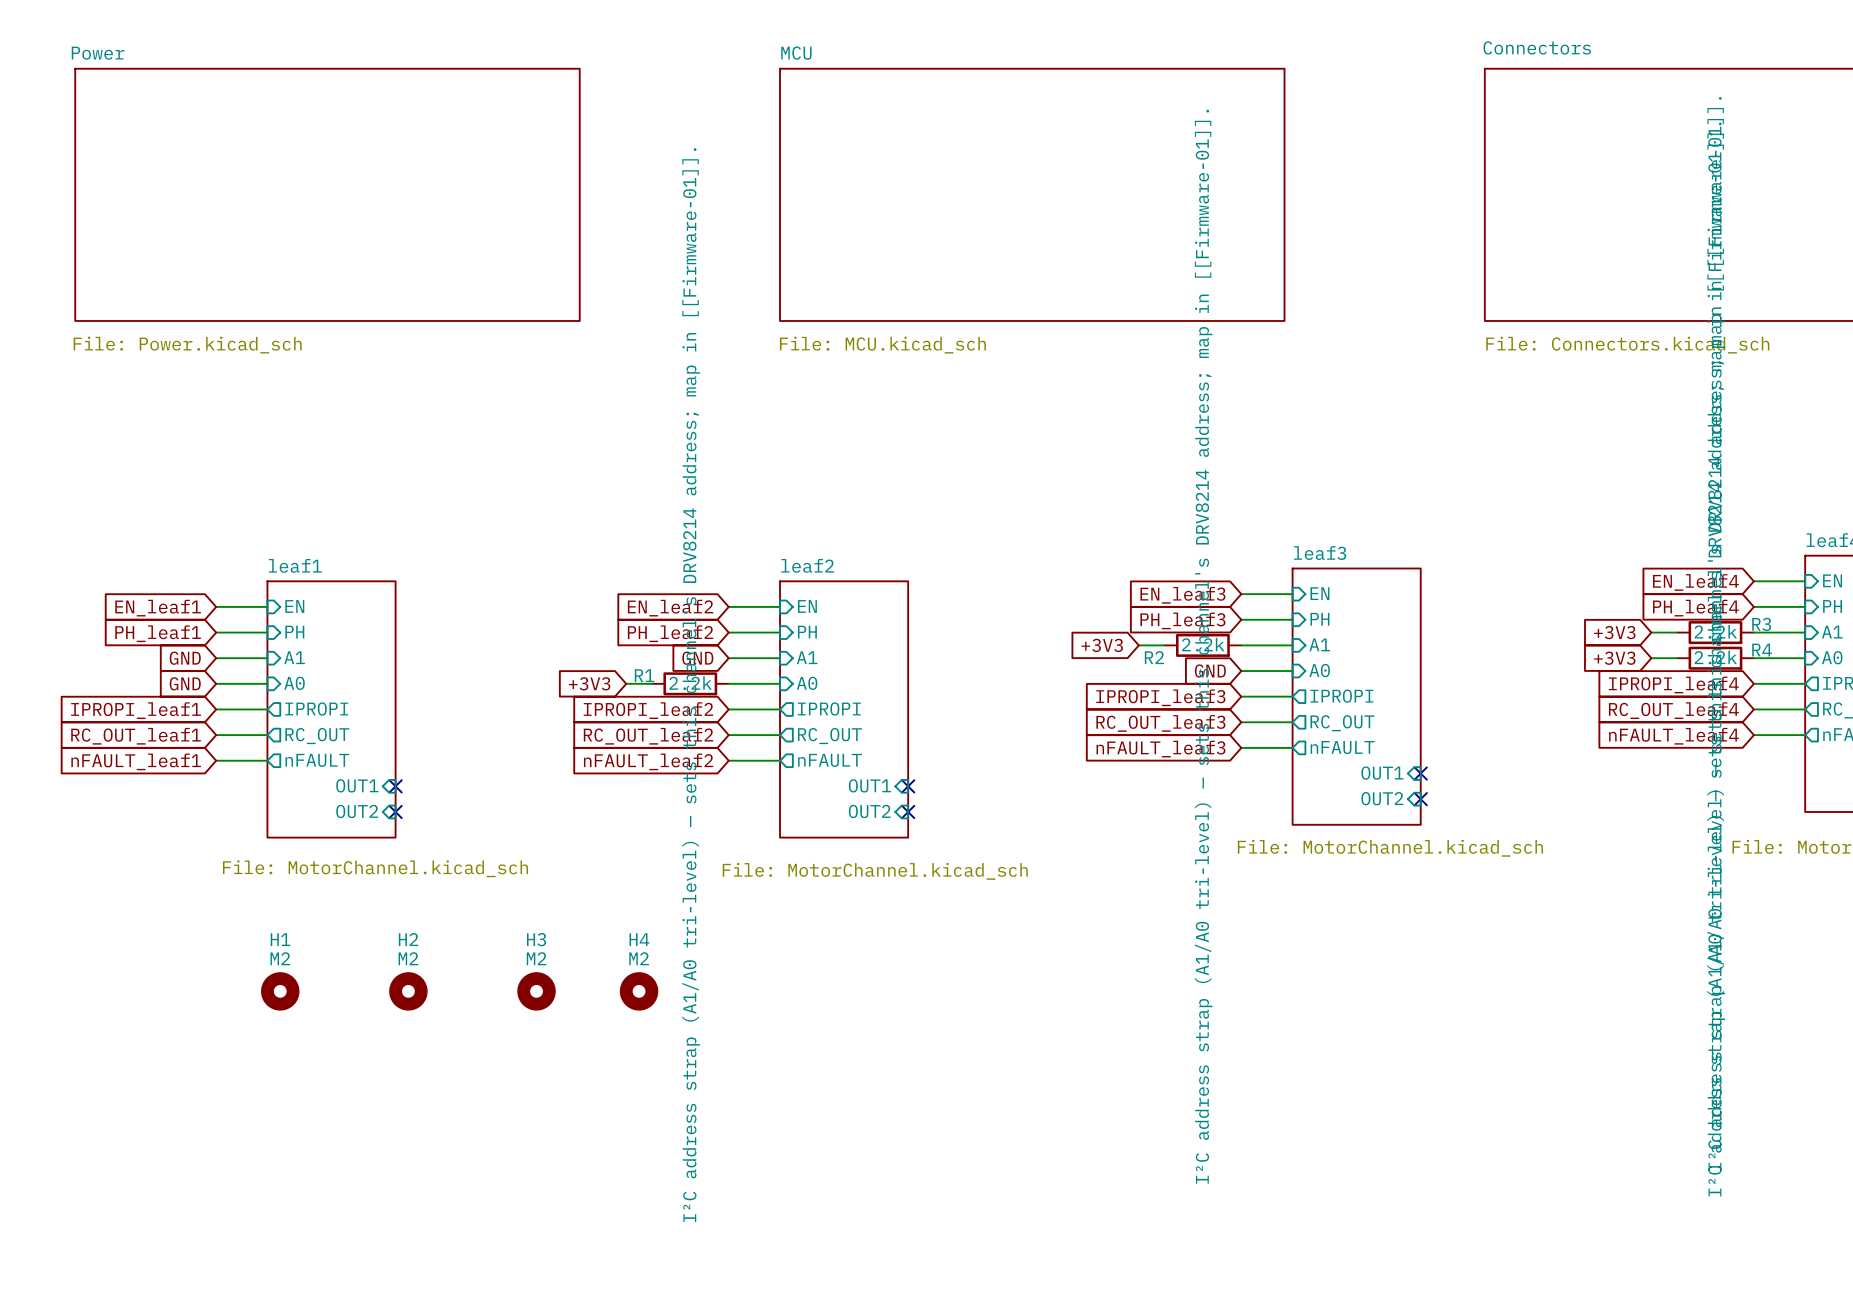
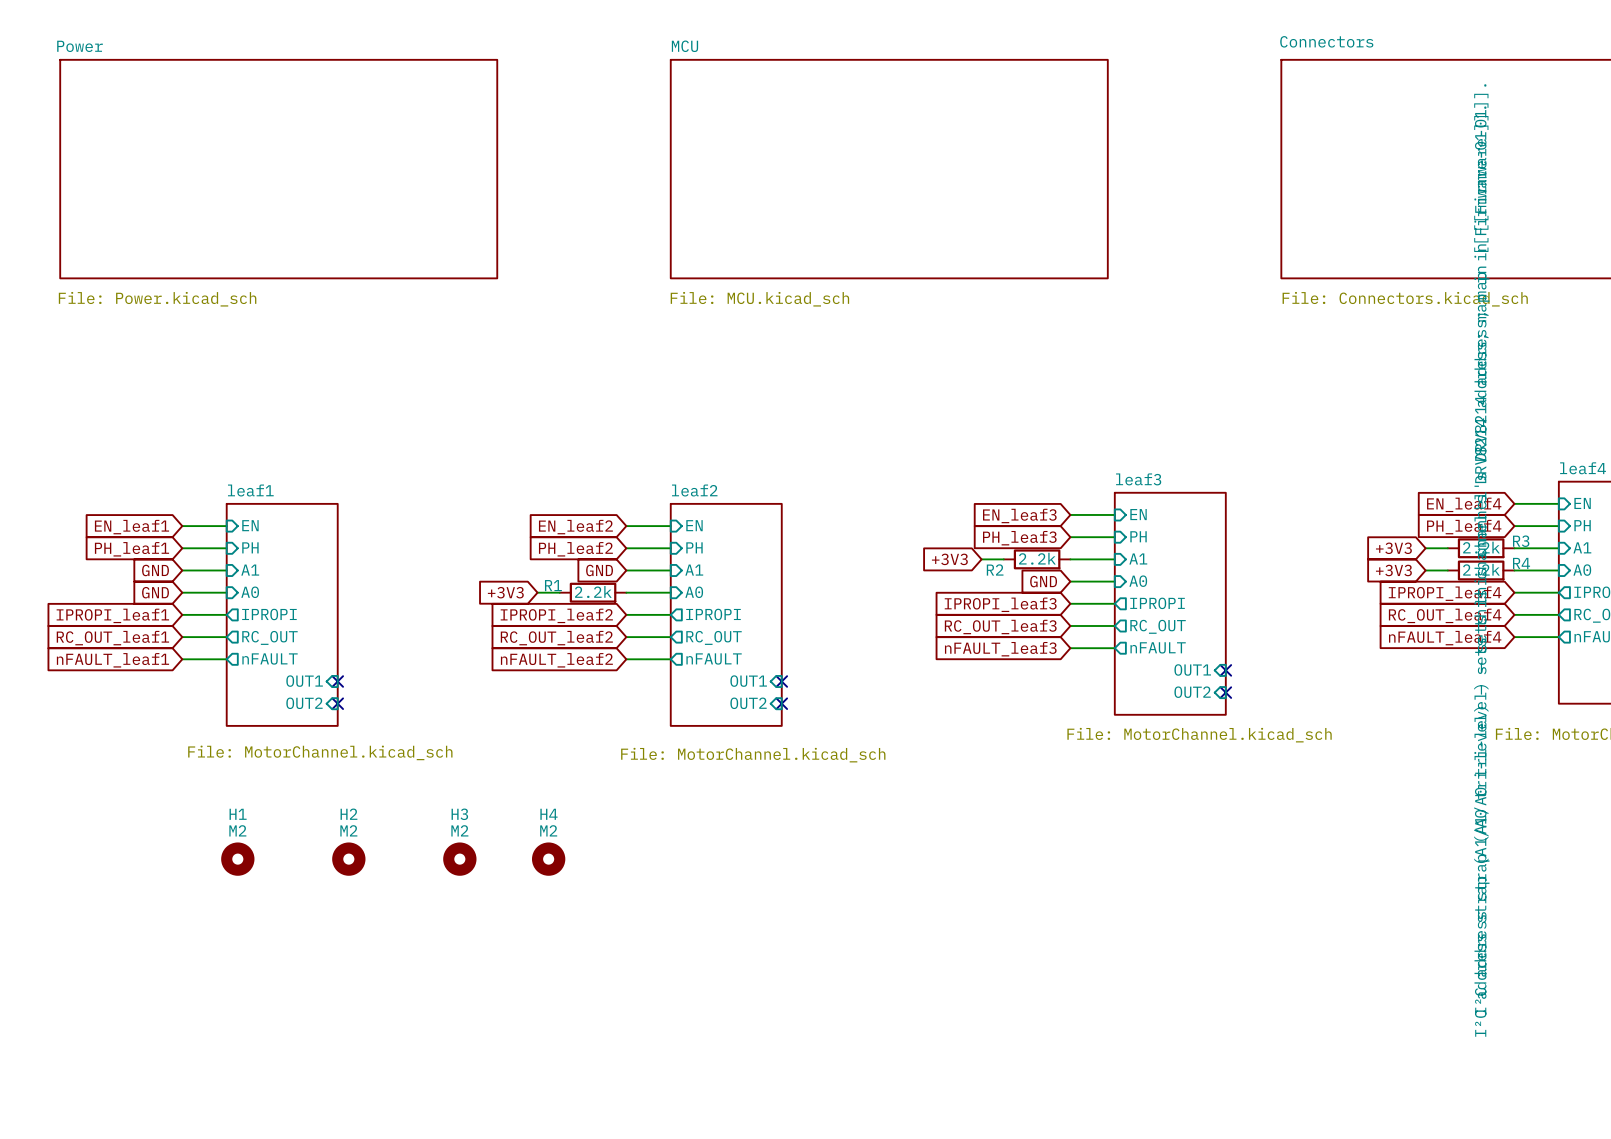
R2 text: I²C address strap (A1/A0 tri-level) — sets this channel's DRV8214 address; map in [[Firmware-01]]. (1203, 646) -> none
R1 text: I²C address strap (A1/A0 tri-level) — sets this channel's DRV8214 address; map in [[Firmware-01]]. (691, 685) -> none

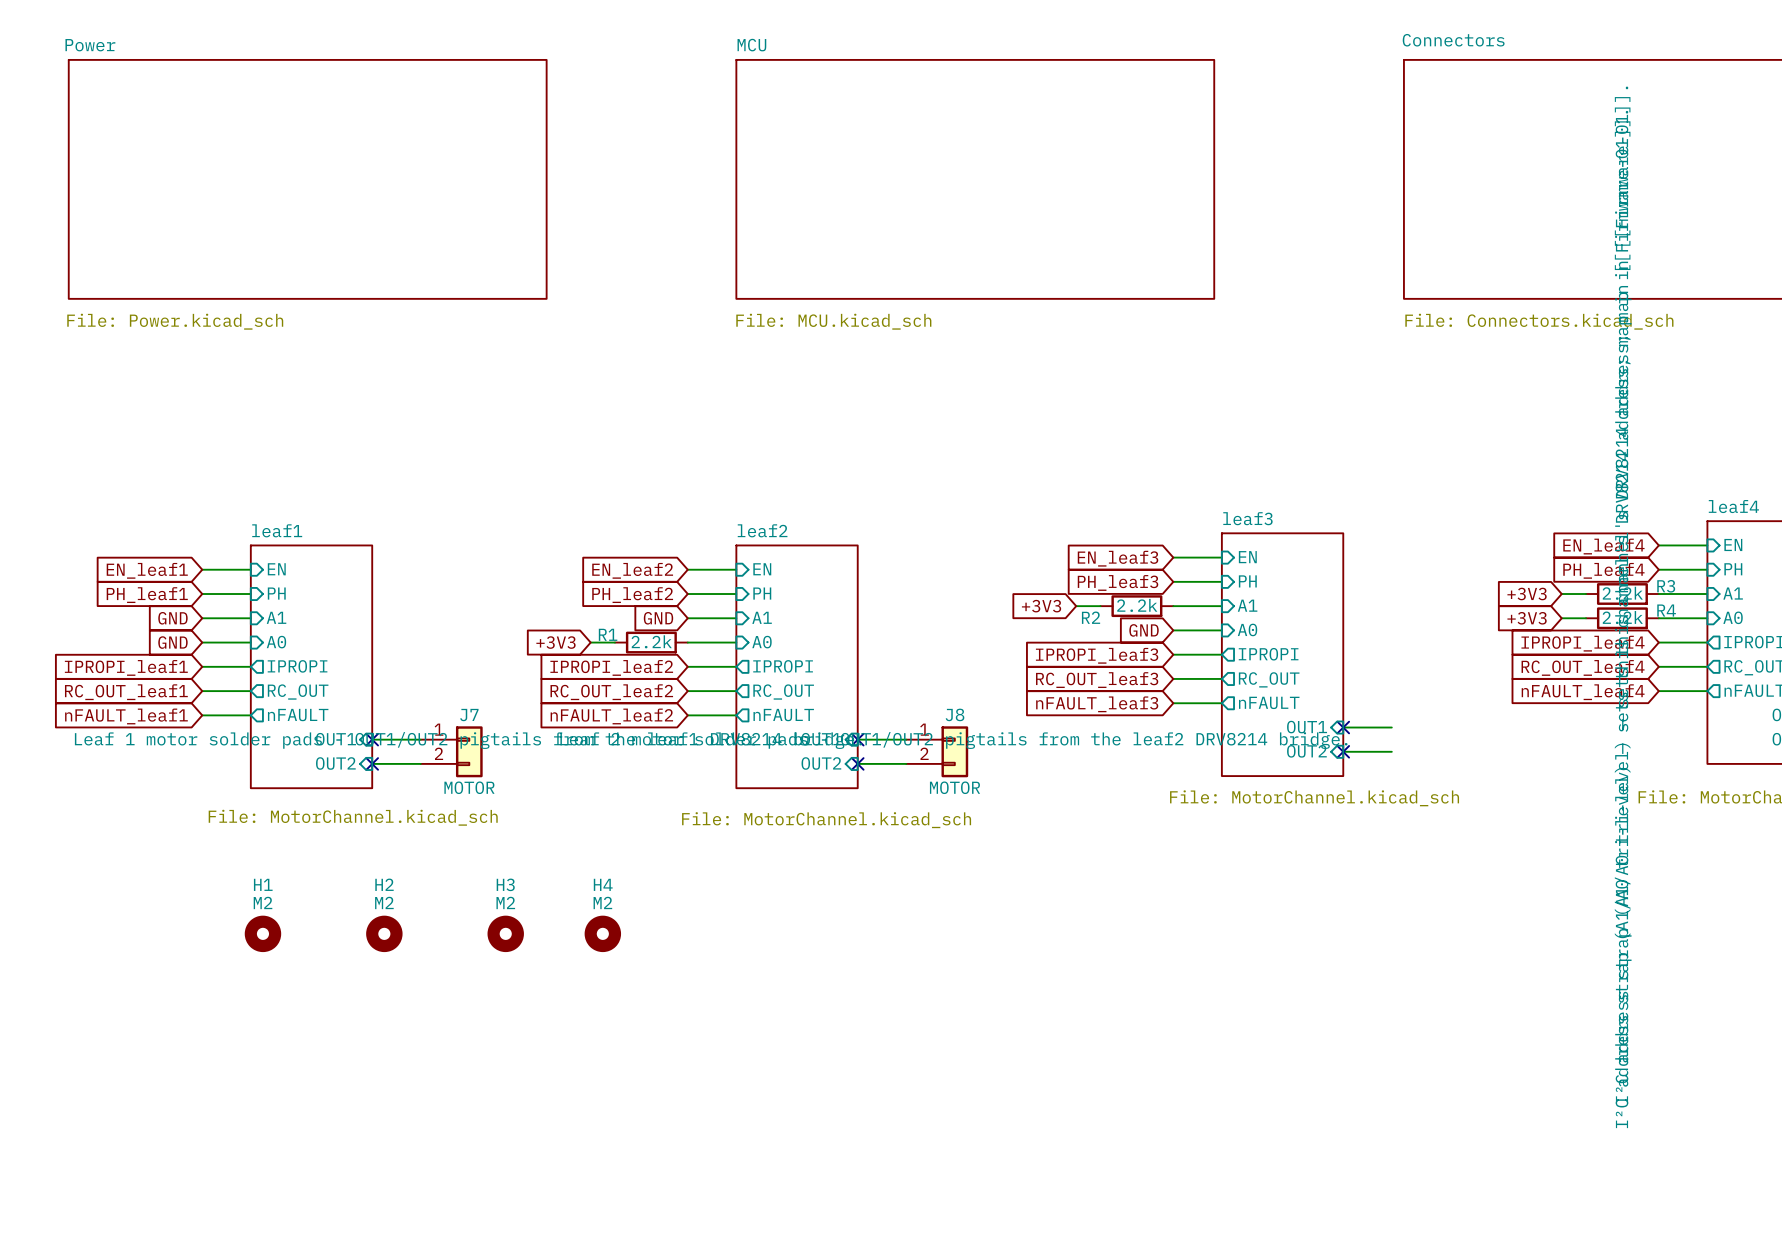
wire: none -> (1343, 727) (1391, 727)
wire: none -> (372, 739) (420, 739)
wire: none -> (857, 739) (906, 739)
J7: none -> MOTOR (451, 751)
J8: none -> MOTOR (937, 751)
wire: none -> (1343, 751) (1391, 751)
wire: none -> (372, 763) (420, 763)
wire: none -> (857, 763) (906, 763)

